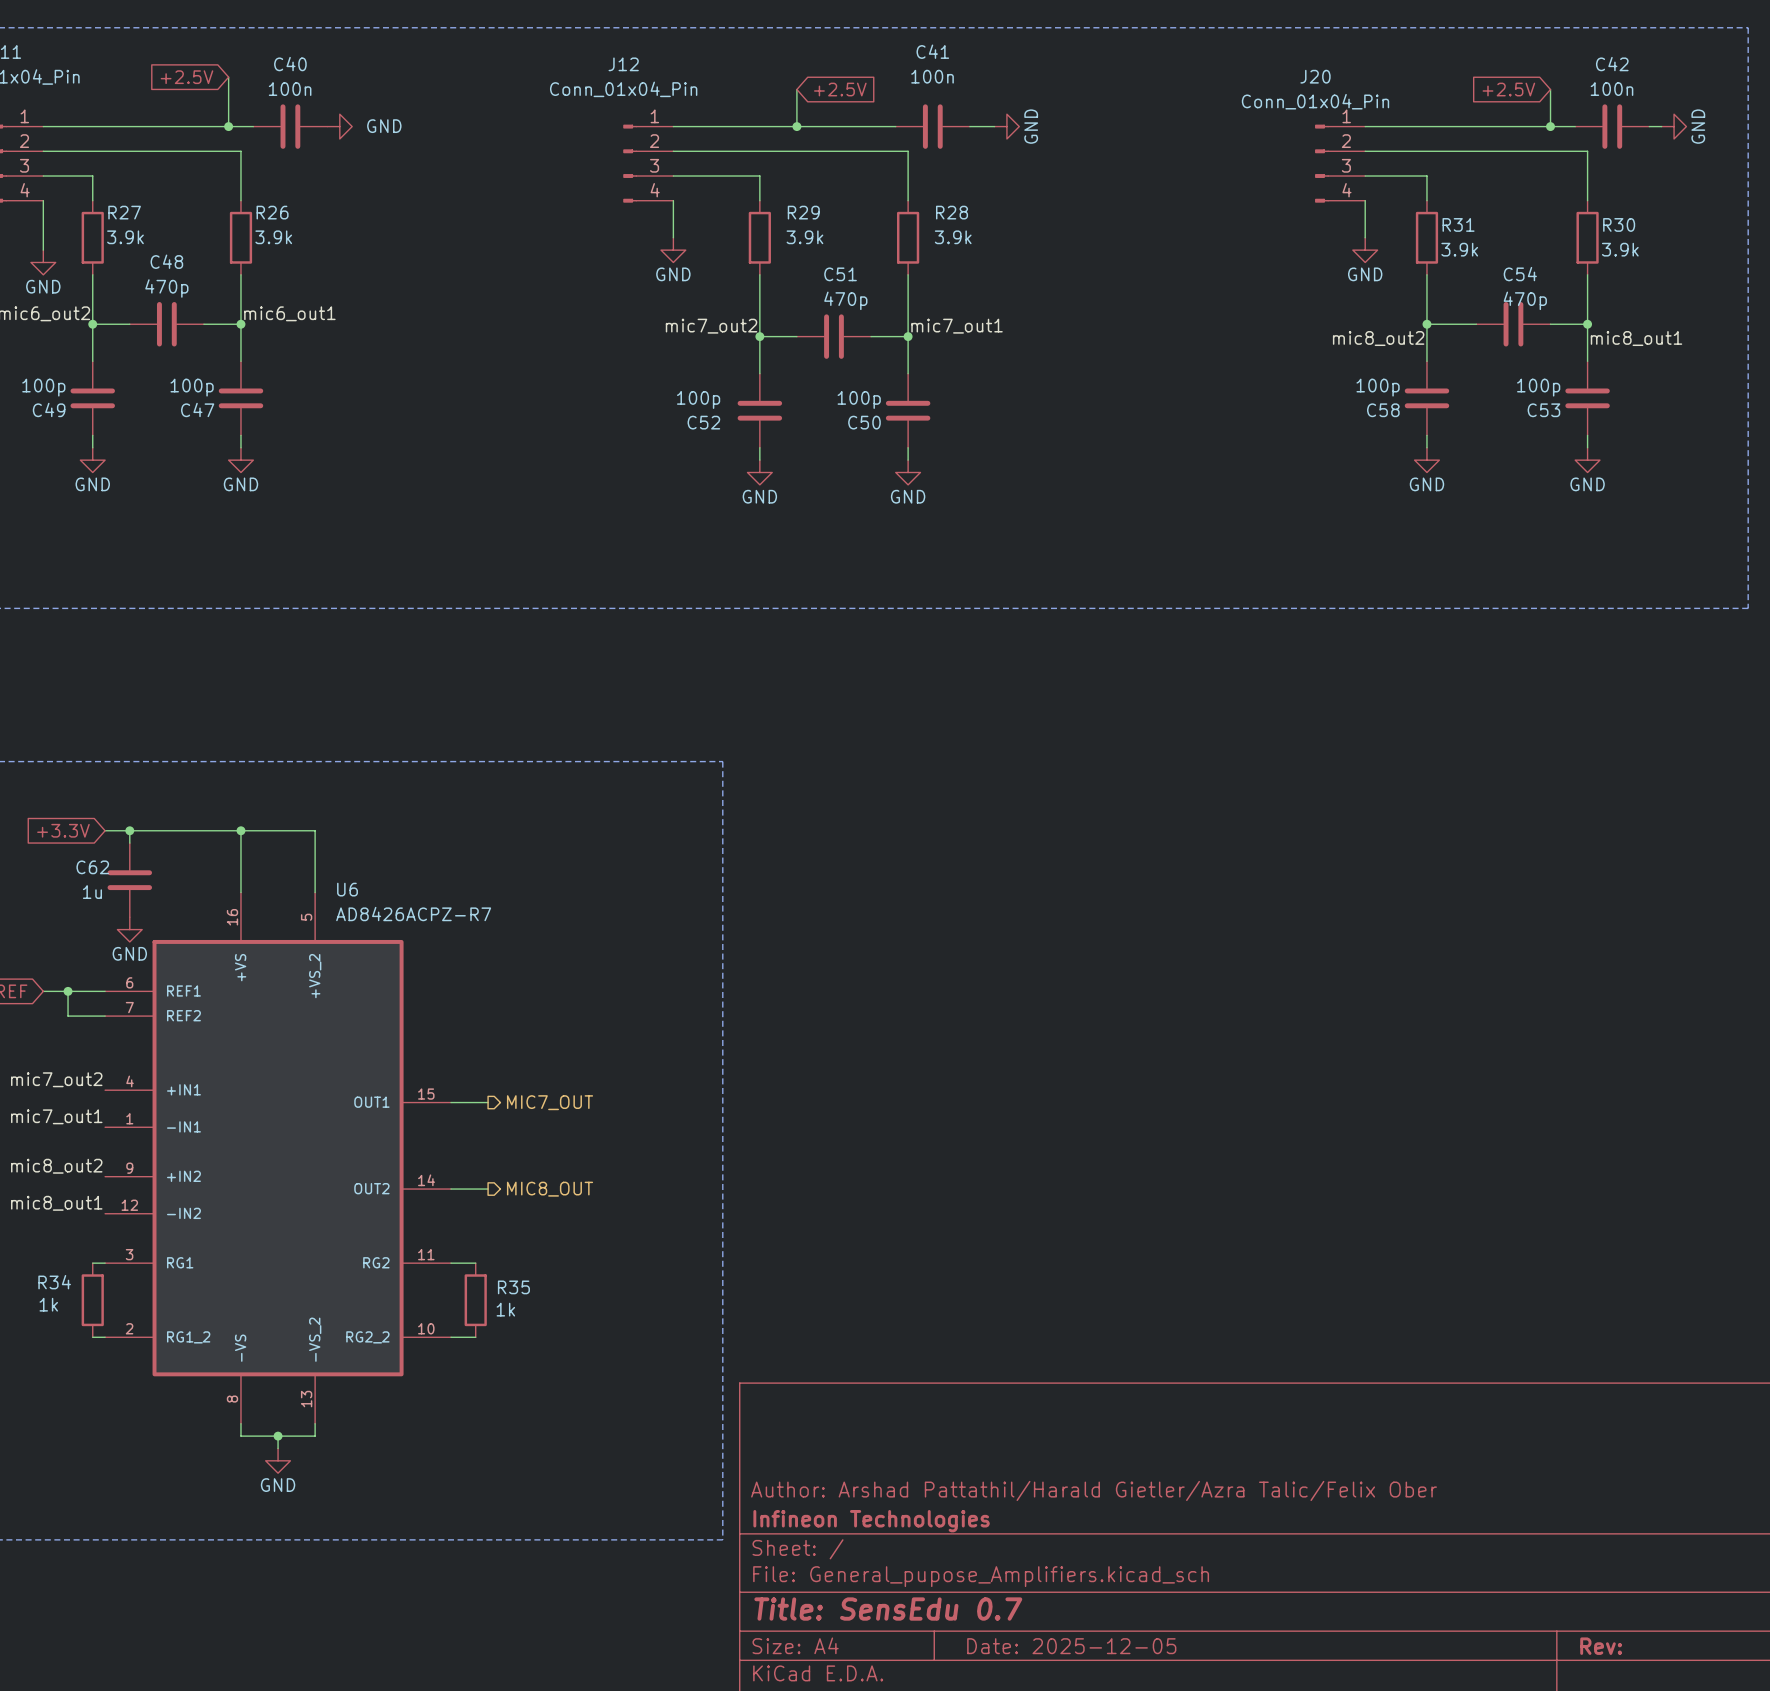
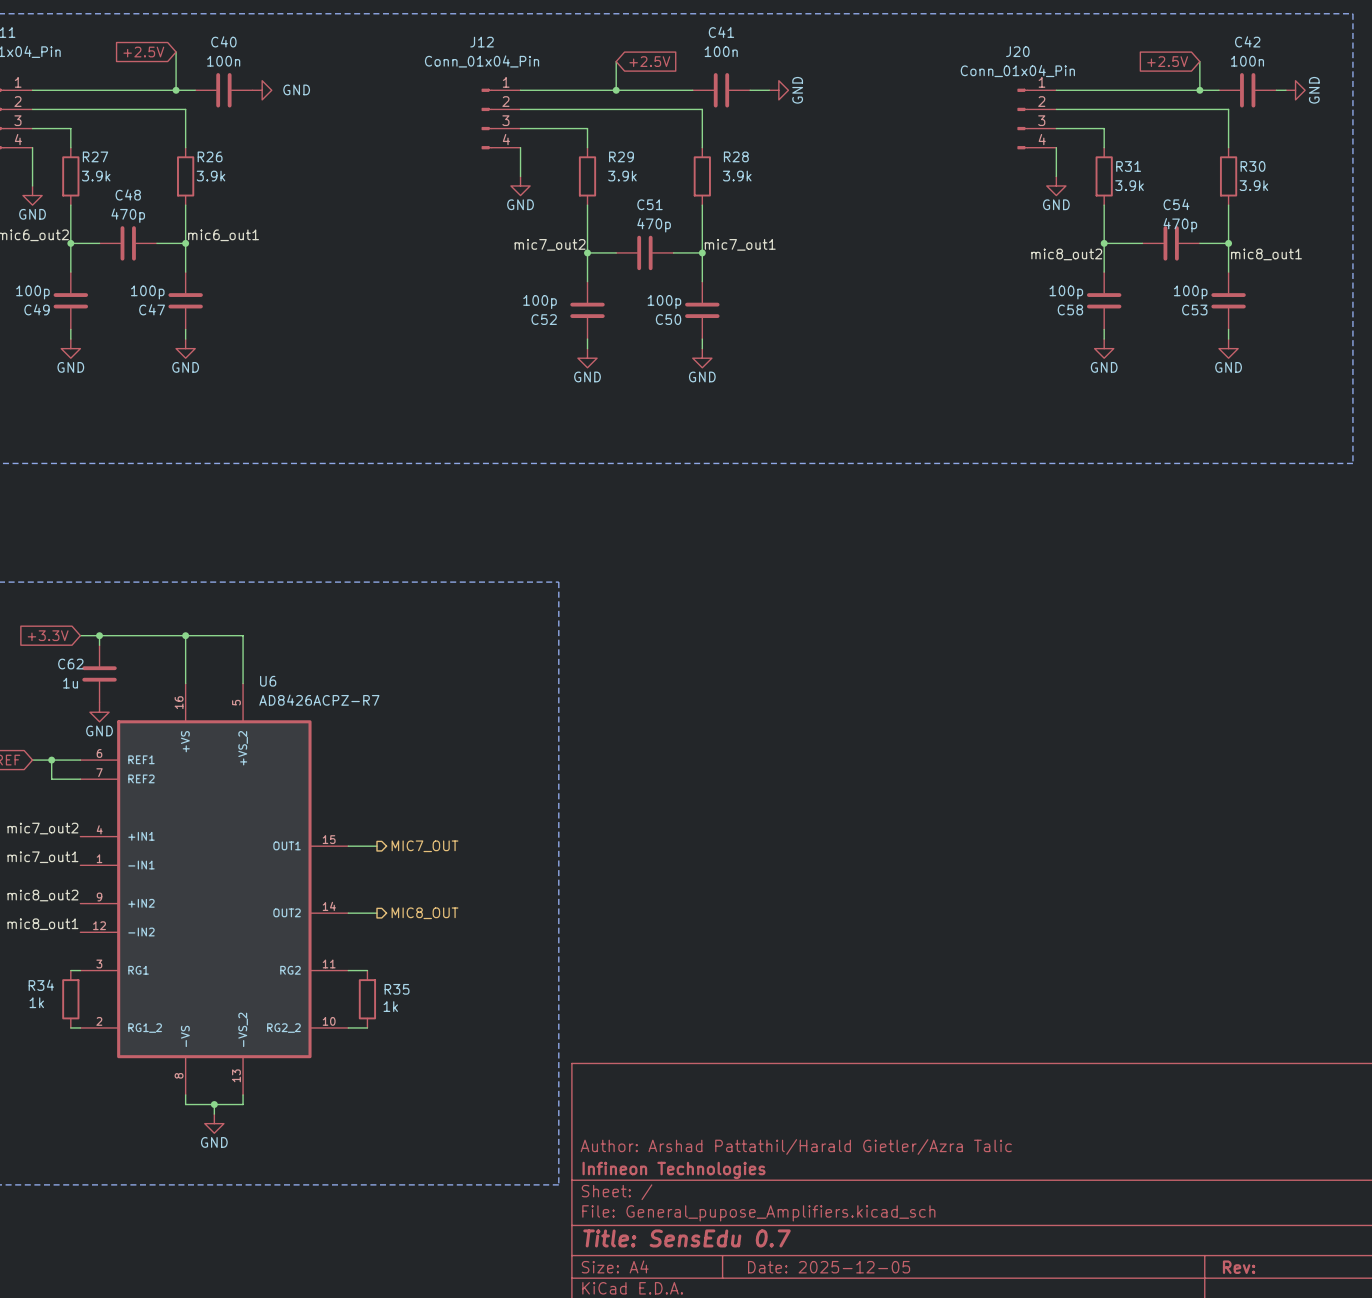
title block: Author: Arshad Pattathil/Harald Gietler/Azra Talic/Felix Ober (1094, 1490) -> Author: Arshad Pattathil/Harald Gietler/Azra Talic (796, 1146)

